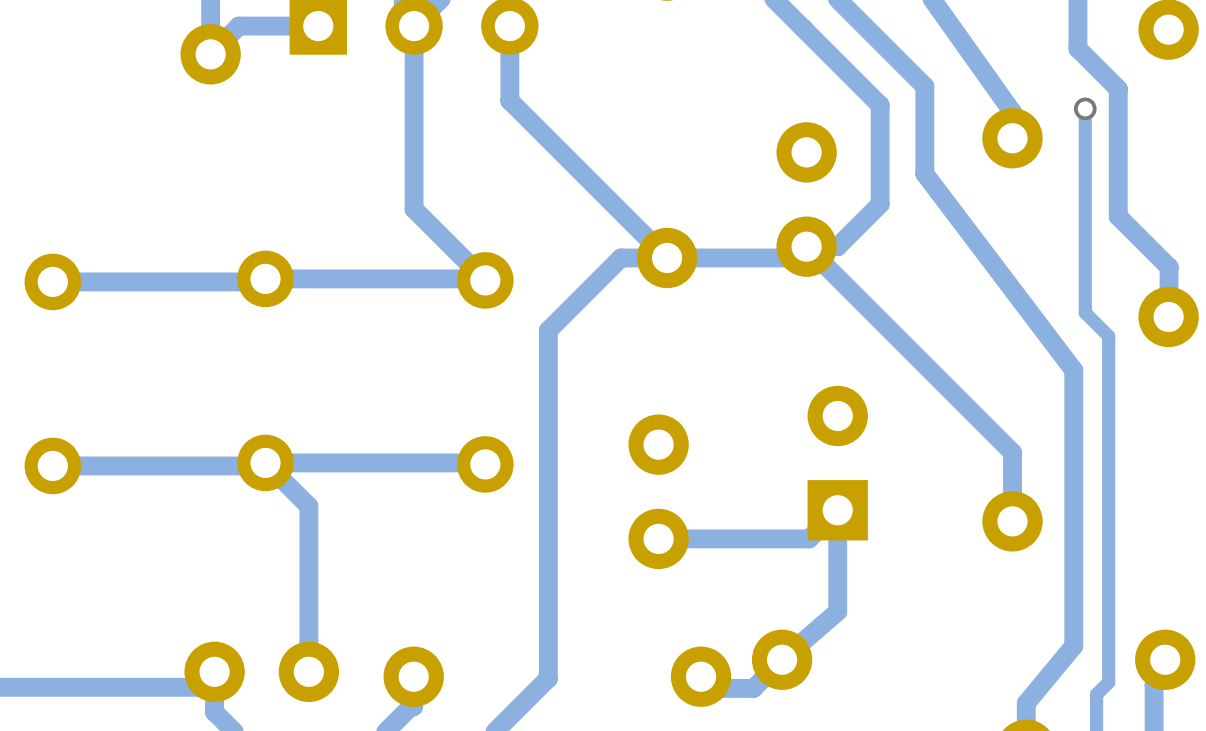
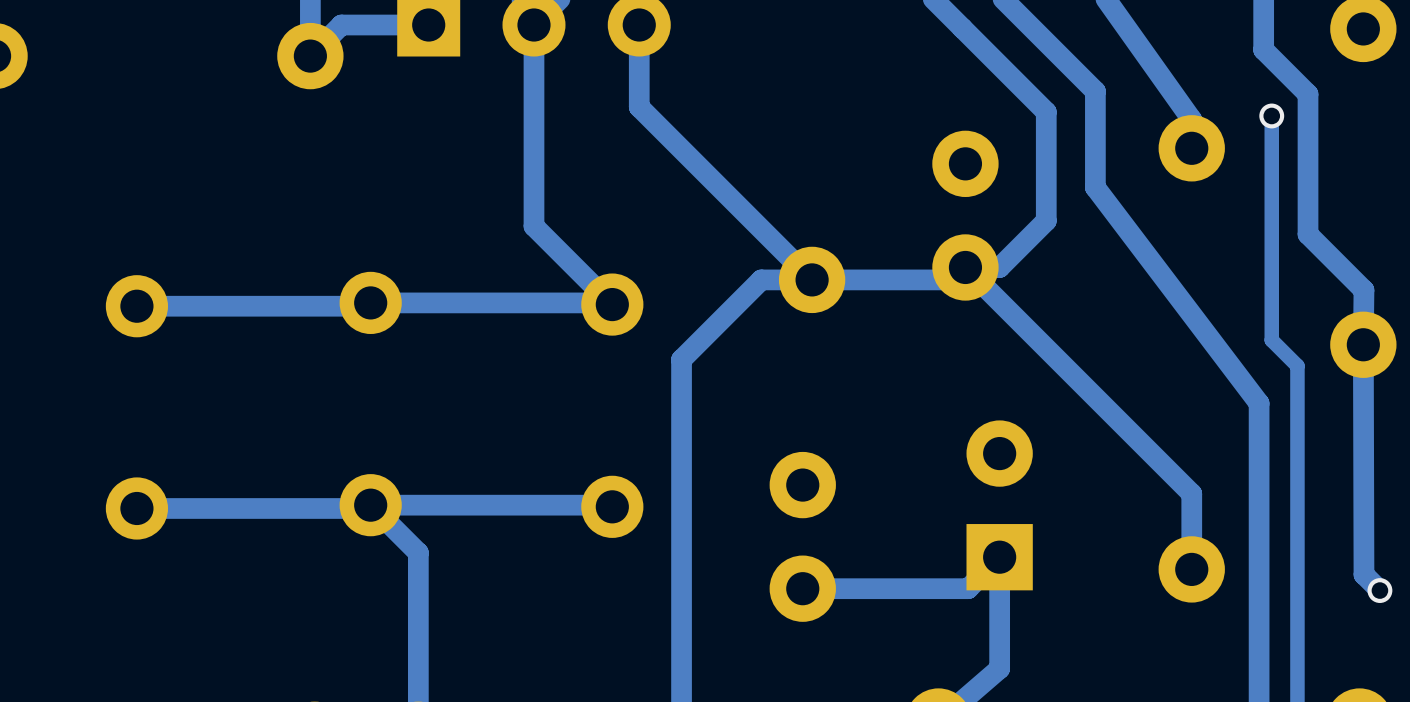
track: none -> (1363, 344) (1363, 574) (1379, 590)
via: none -> (1379, 590)

